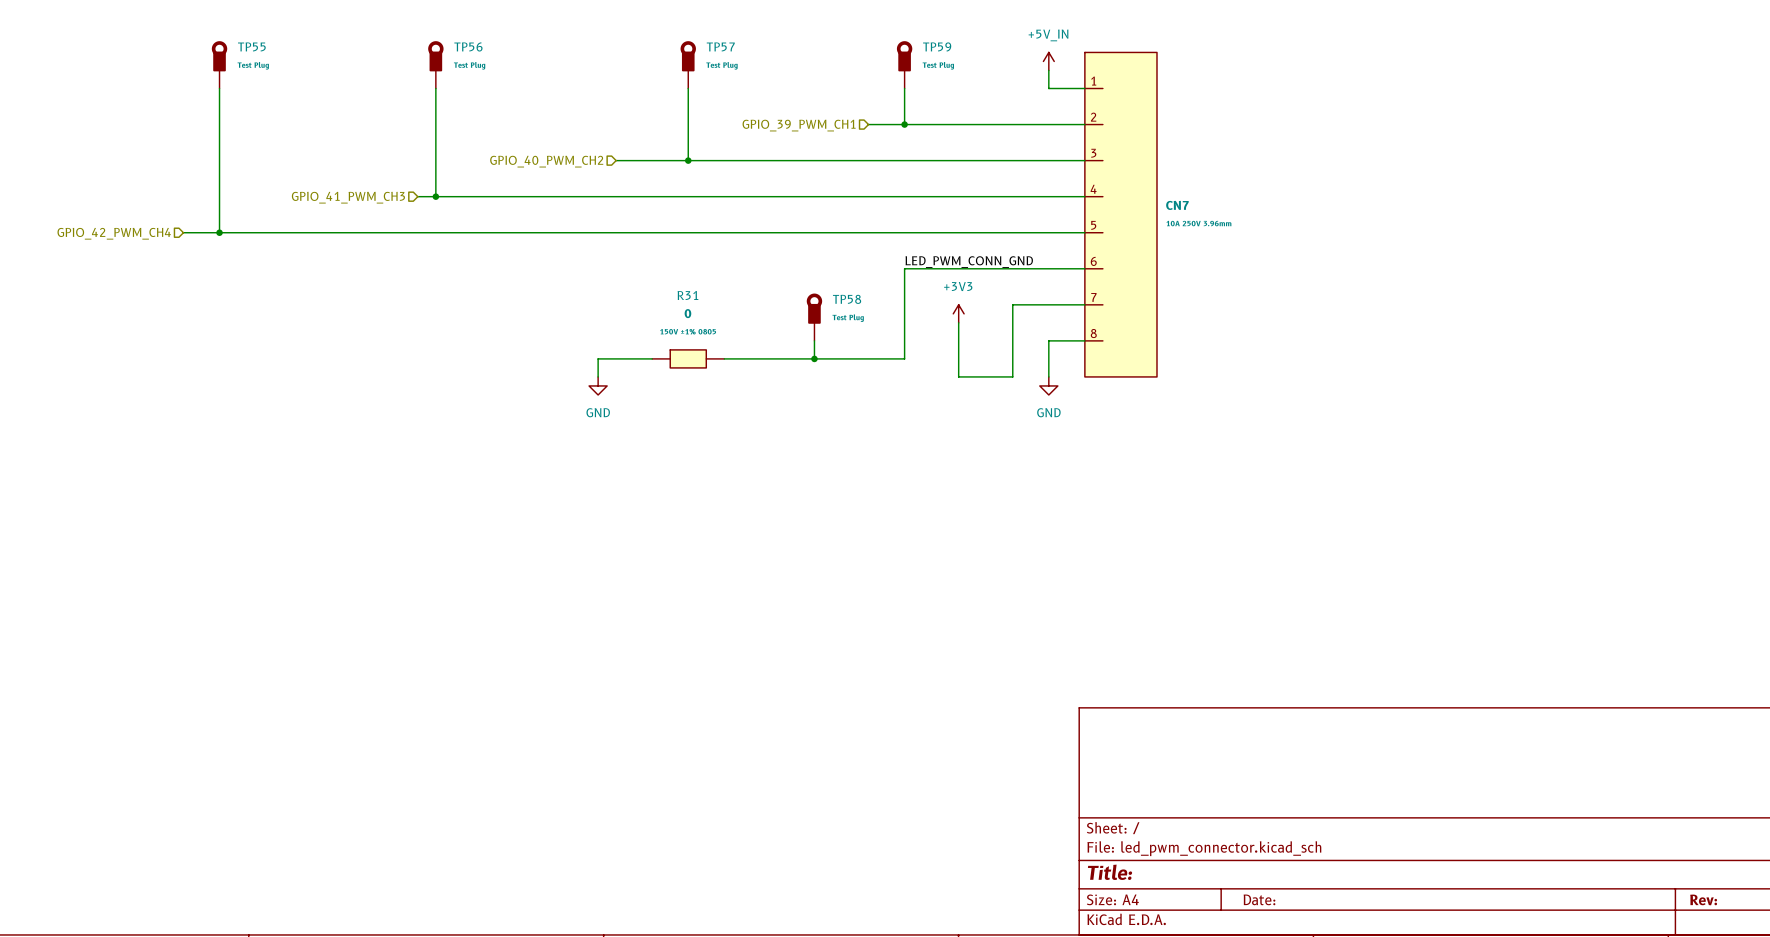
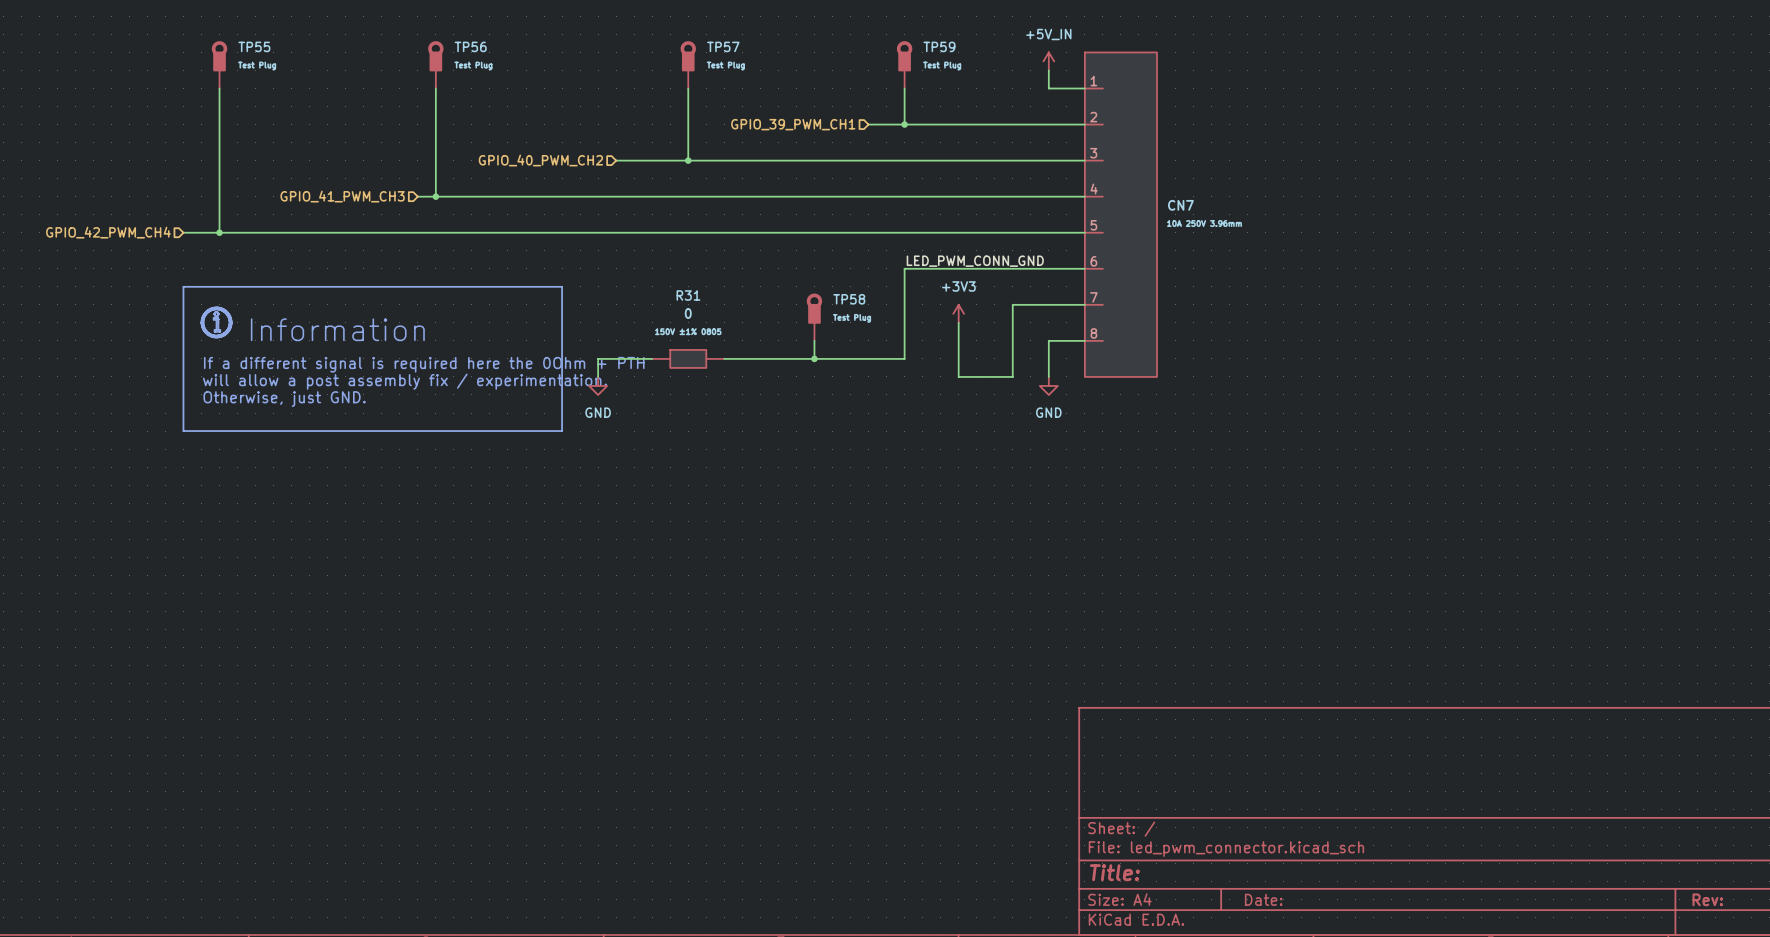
line: none -> (183, 286) (562, 286) (562, 431) (183, 431) (183, 286)
line: none -> (216, 307) (205, 312) (201, 322) (205, 333) (216, 337) (227, 332) (231, 322) (227, 311) (216, 307)
line: none -> (216, 317) (213, 317) (213, 319) (216, 319) (216, 330) (214, 331) (220, 331) (218, 330) (218, 319)
line: none -> (203, 322) (207, 332) (217, 335) (226, 331) (229, 321) (225, 312) (215, 309) (207, 313) (203, 322)
text: none -> Information (337, 329)
text: none -> If a different signal is required here the 0Ohm + PTH (424, 364)
text: none -> will allow a post assembly fix / experimentation. (405, 381)
text: none -> Otherwise, just GND. (284, 399)

